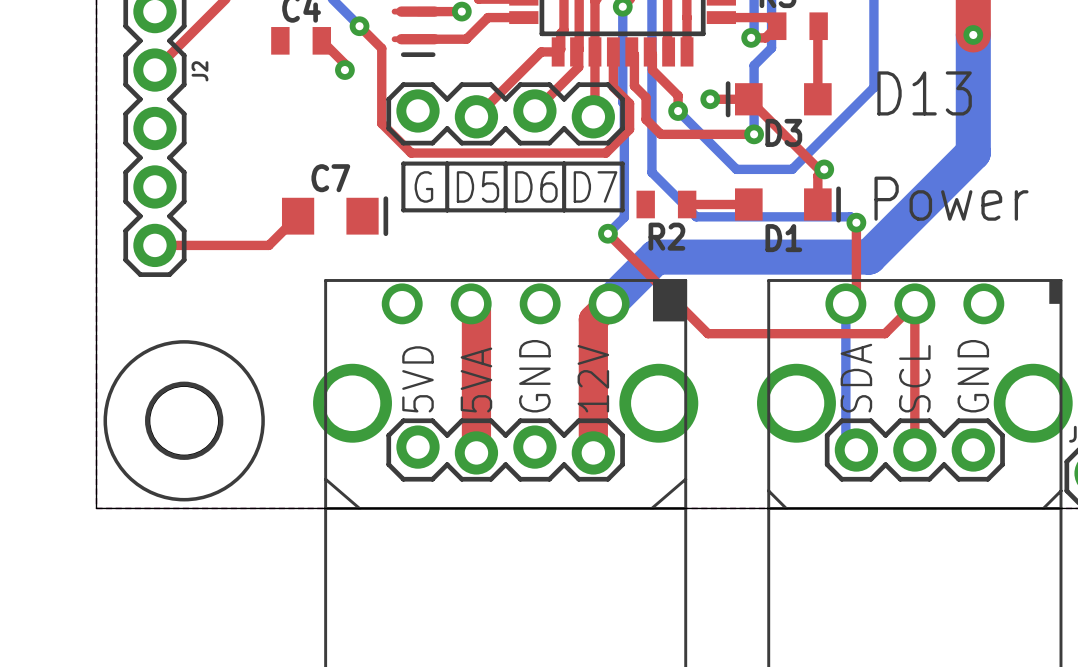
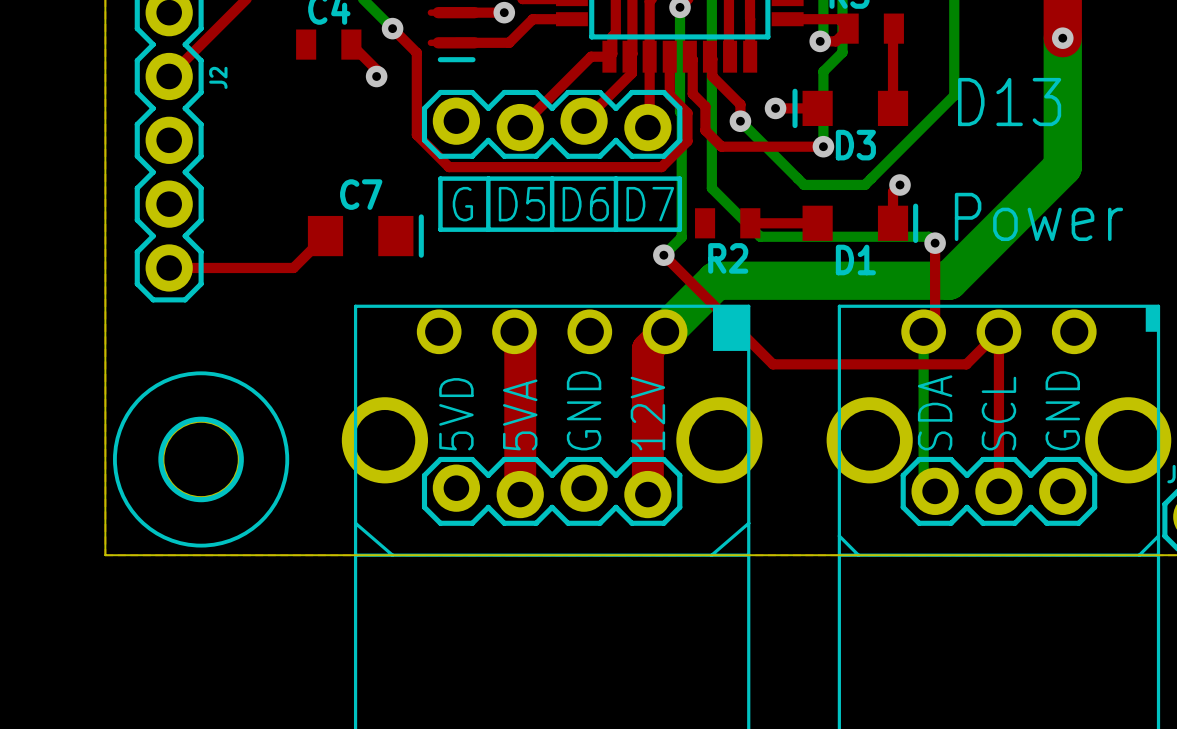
top track: (748, 99) (818, 169) (824, 169) -> none

